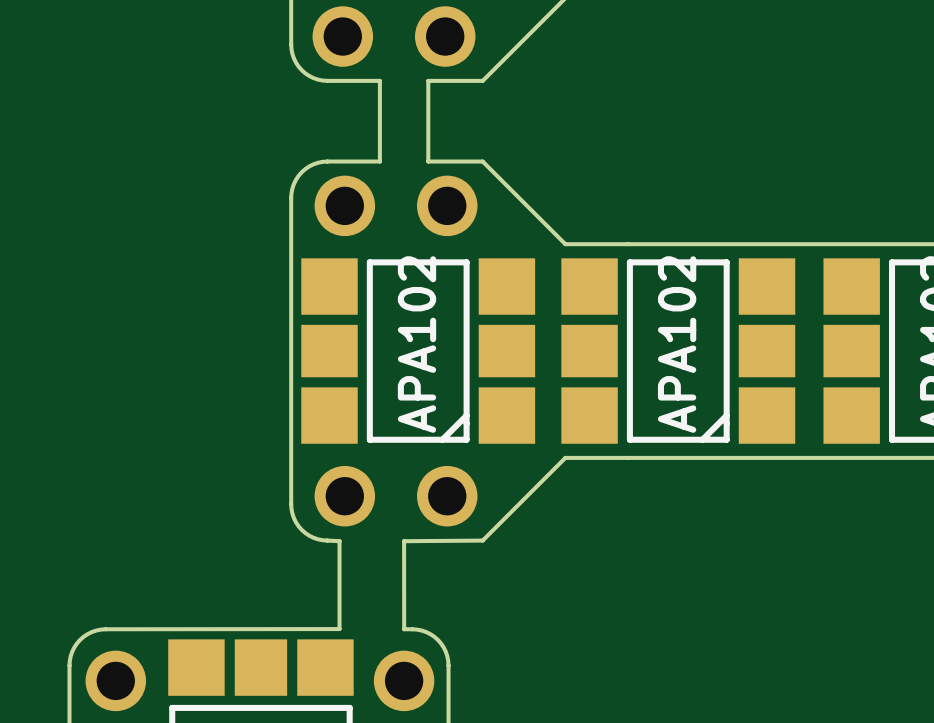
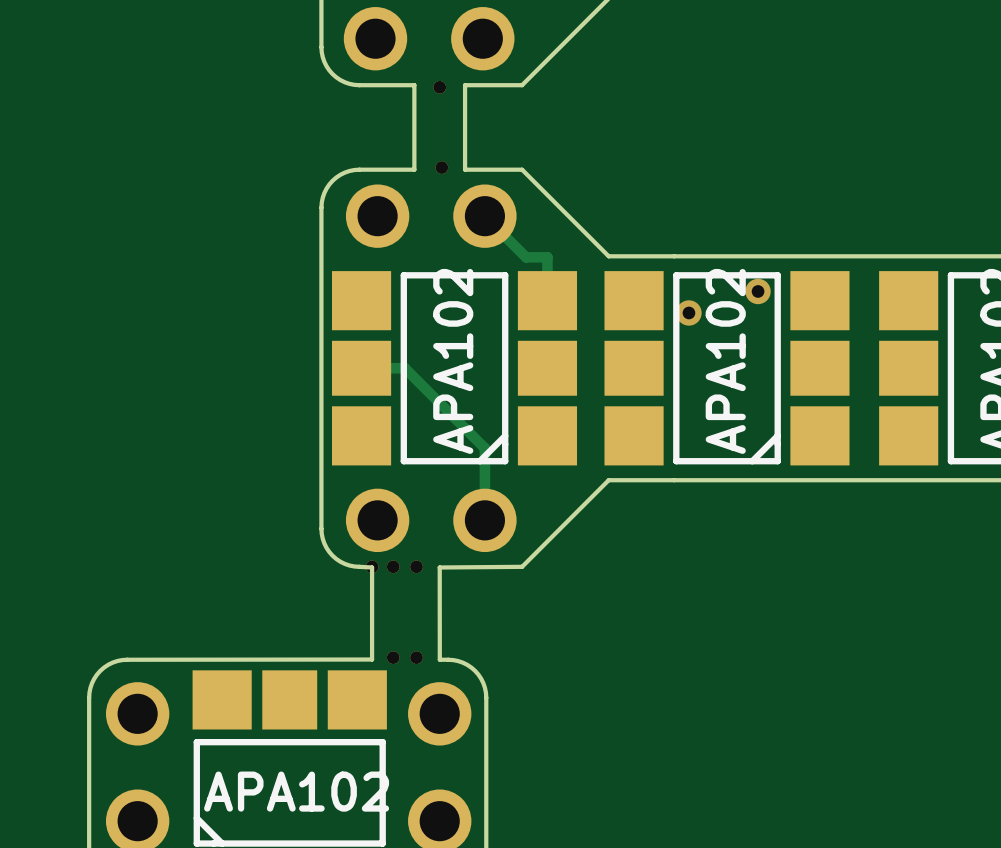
part: none -> (439, 87)
part: none -> (441, 167)
track: none -> (484, 216) (526, 257) (547, 257) (547, 300)
via: none -> (758, 291)
via: none -> (688, 312)
track: none -> (361, 368) (404, 368) (484, 448) (484, 520)
part: none -> (372, 566)
part: none -> (393, 566)
part: none -> (416, 566)
part: none -> (393, 657)
part: none -> (416, 657)

